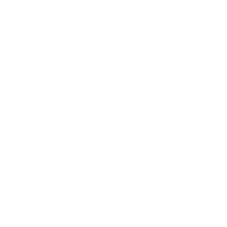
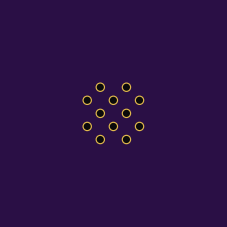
part: none -> (113, 113)

